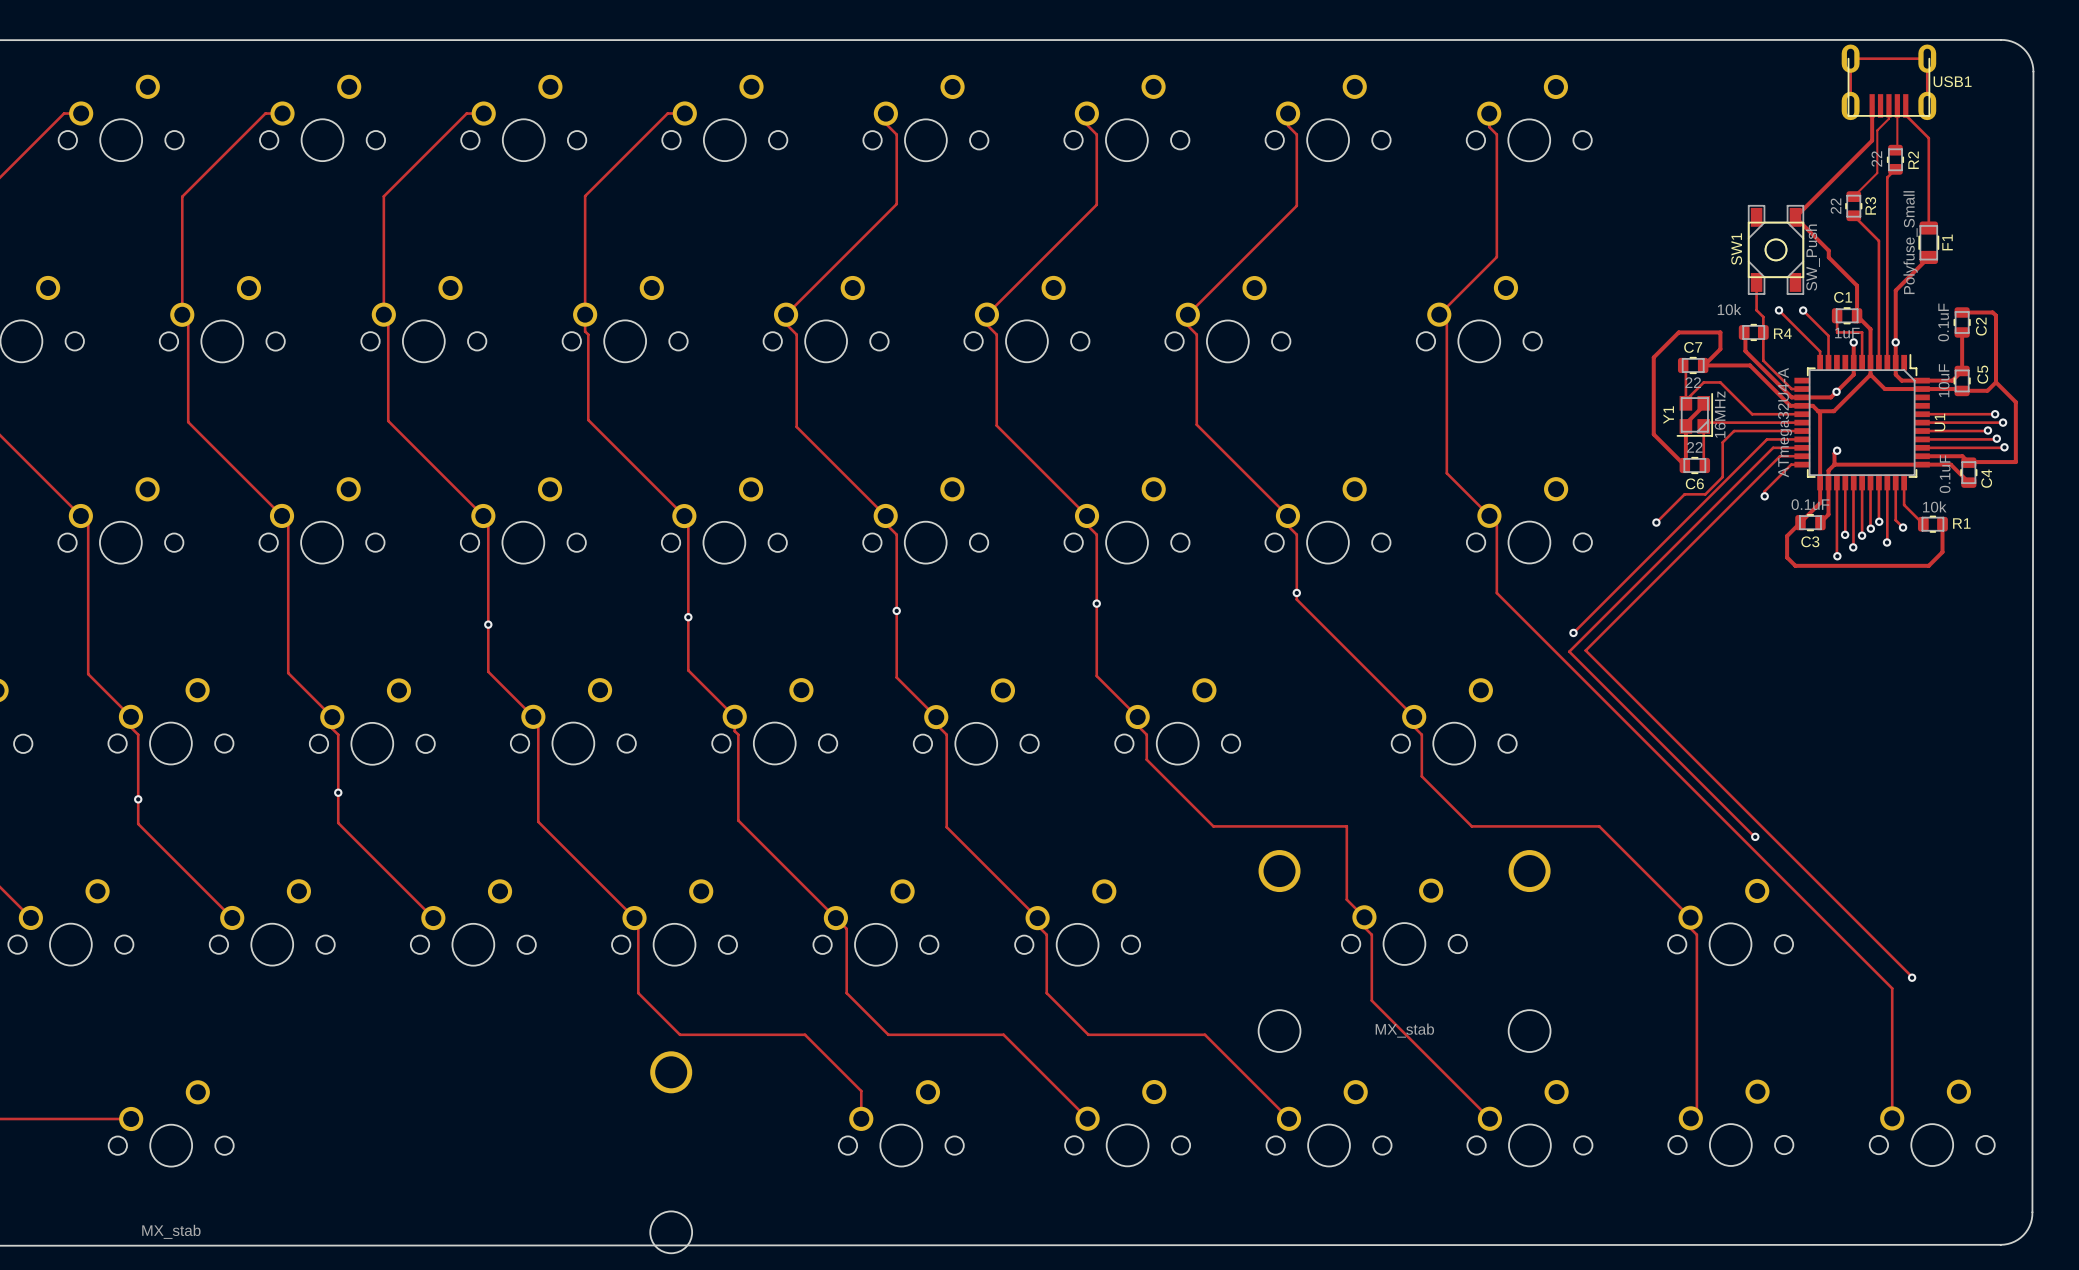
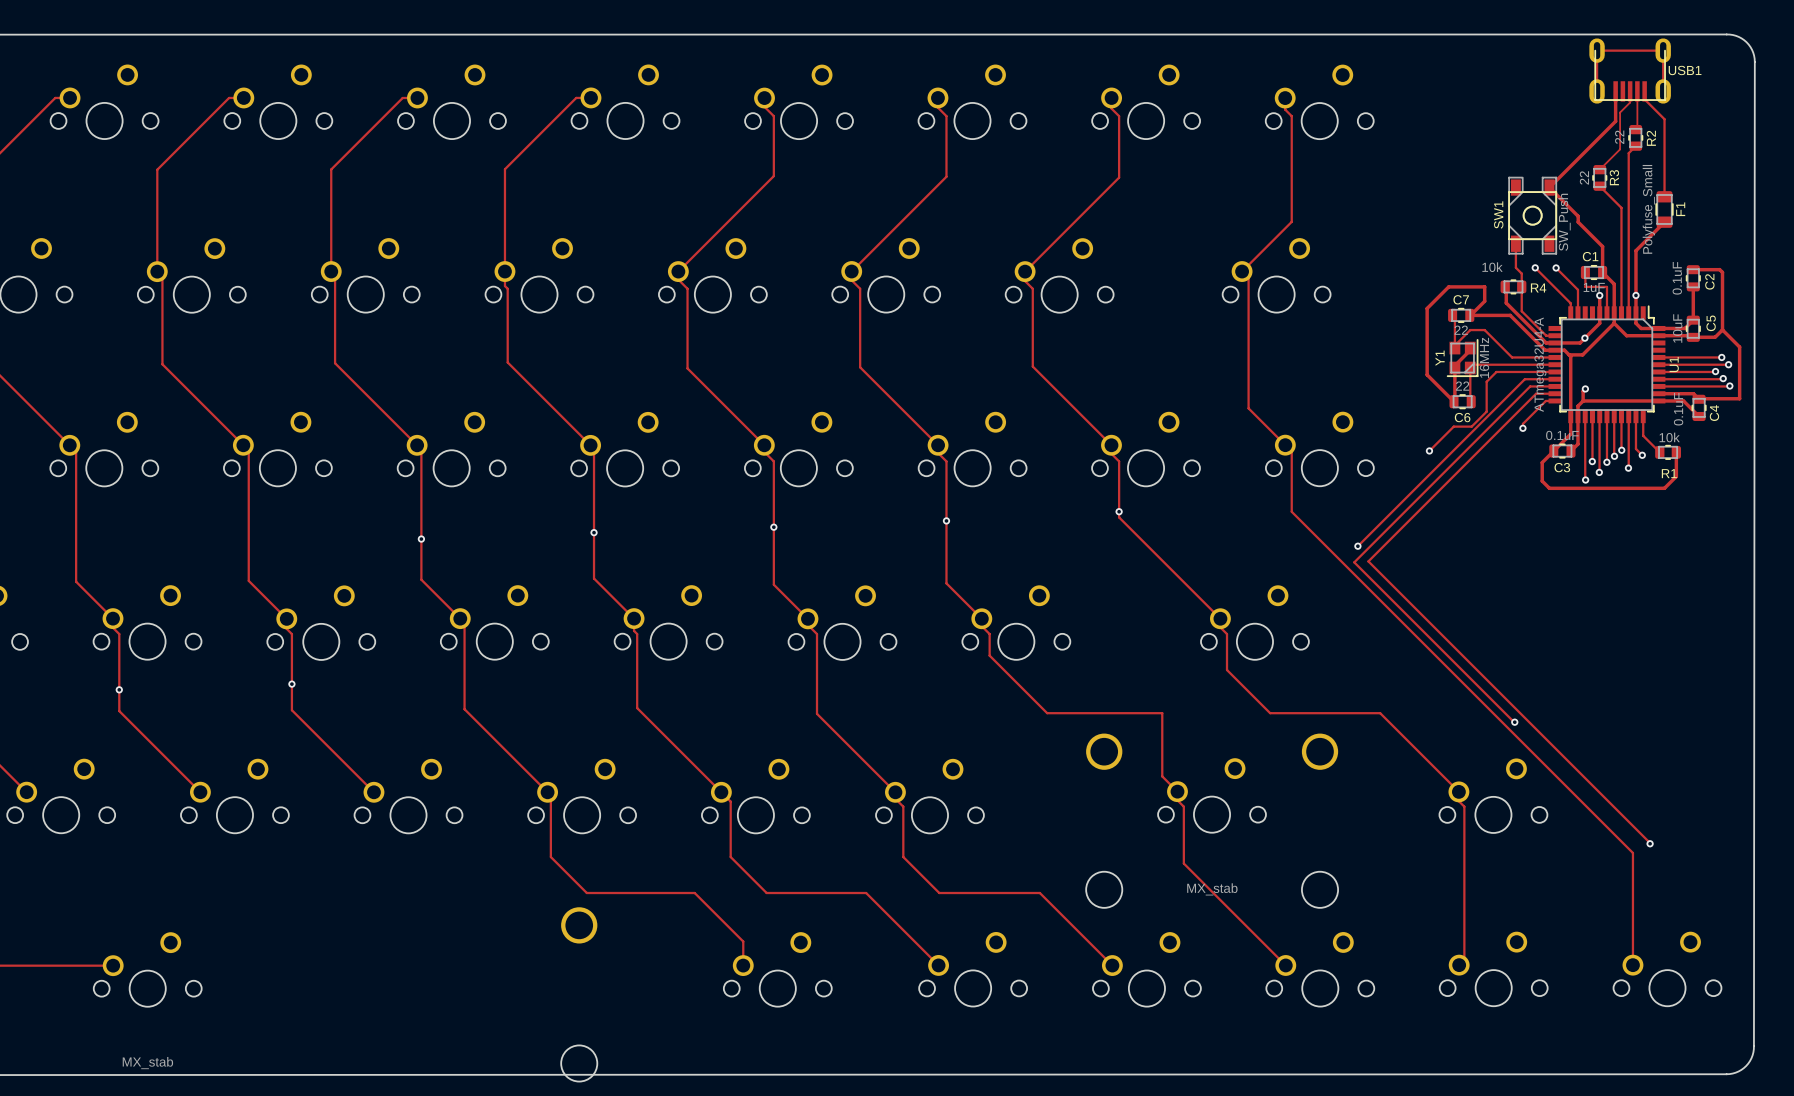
R1 name position: R1 (1961, 523) -> R1 (1669, 473)

